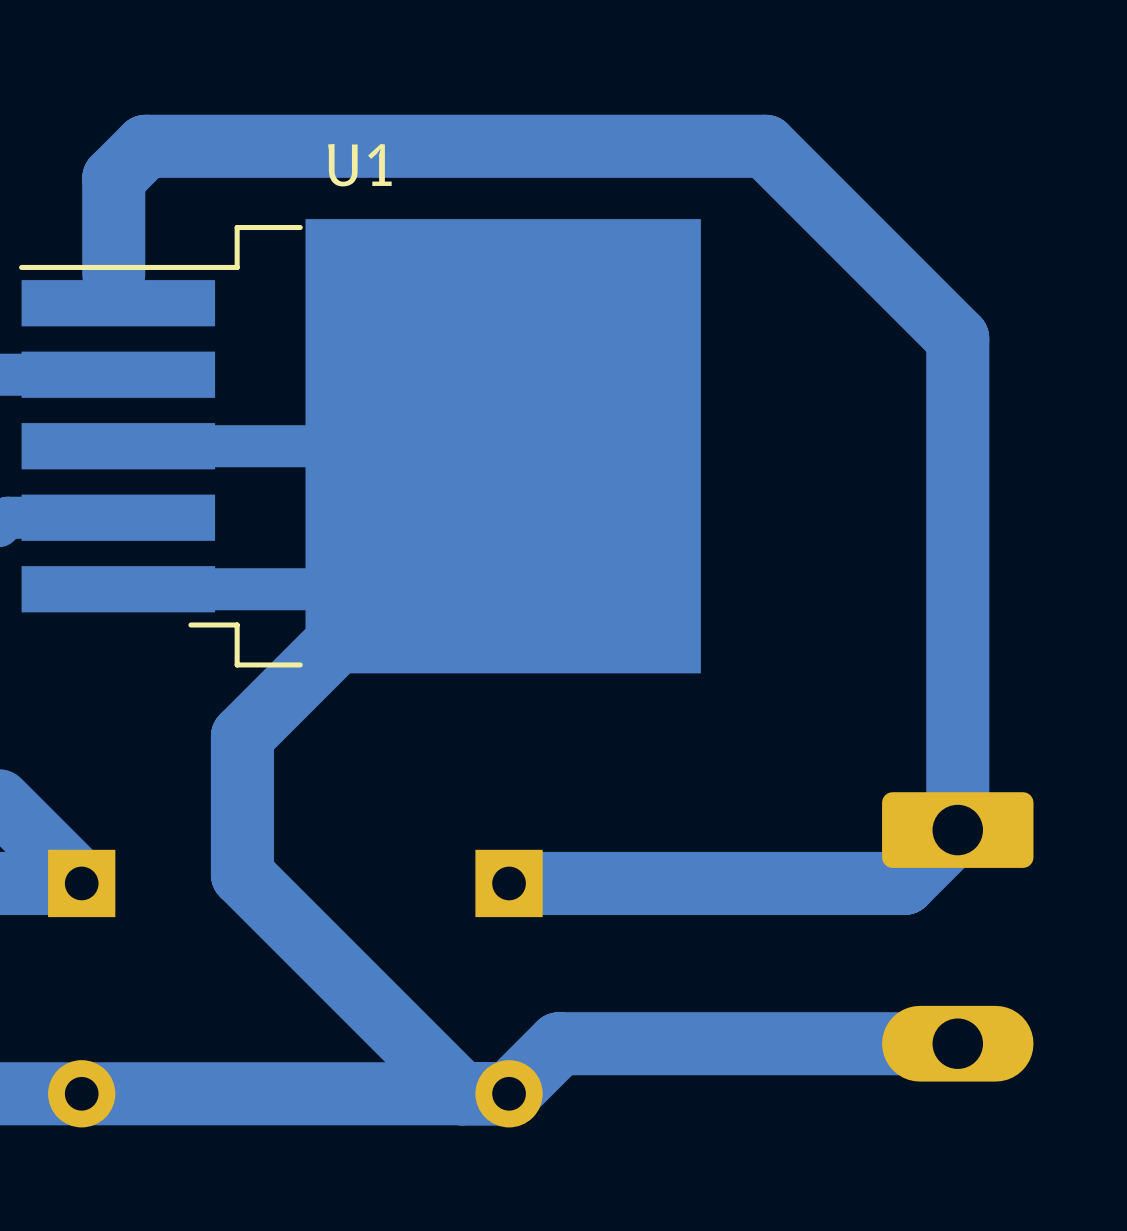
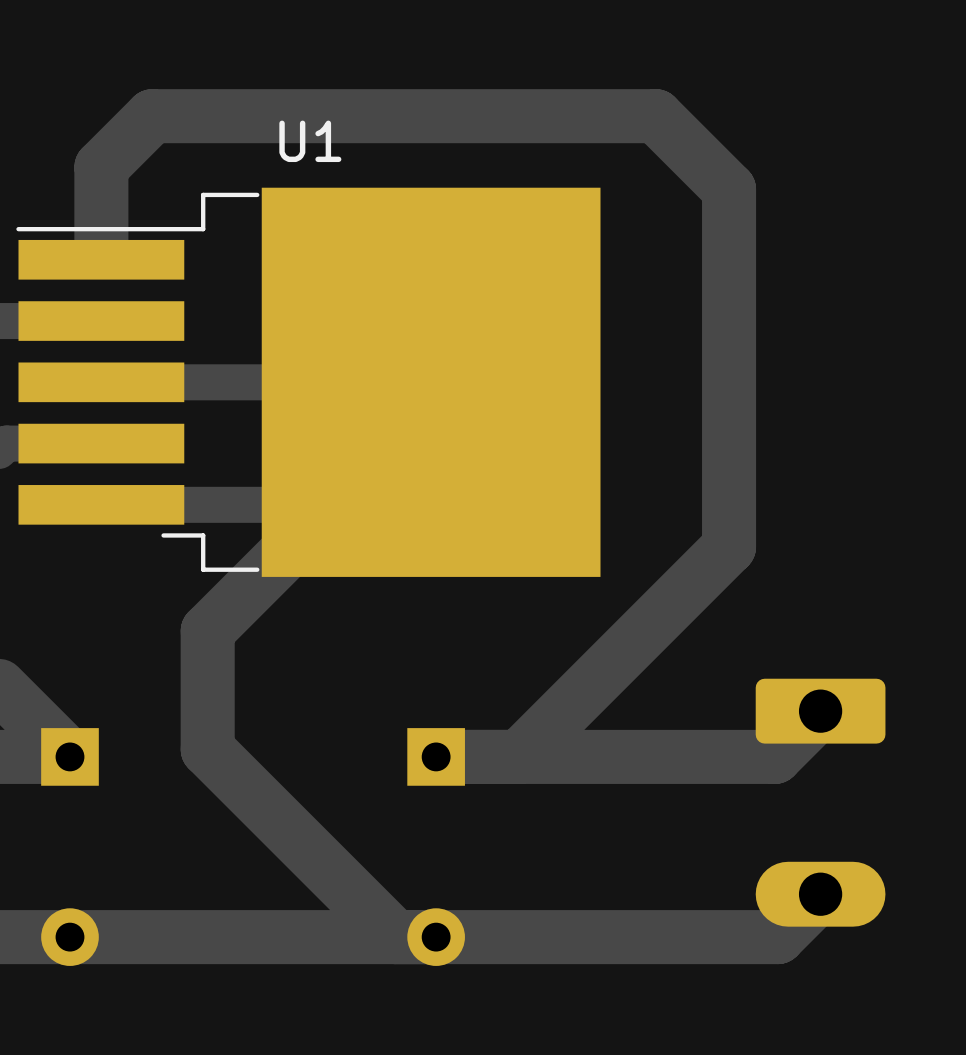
track: none -> (101, 248) (101, 167) (152, 116) (655, 116) (729, 189) (729, 546) (519, 756)
track: (118, 303) (113, 274) (113, 178) (145, 146) (765, 146) (957, 338) (957, 830) -> none
track: (957, 1043) (559, 1043) (509, 1093) -> (820, 894) (777, 937) (436, 937)

